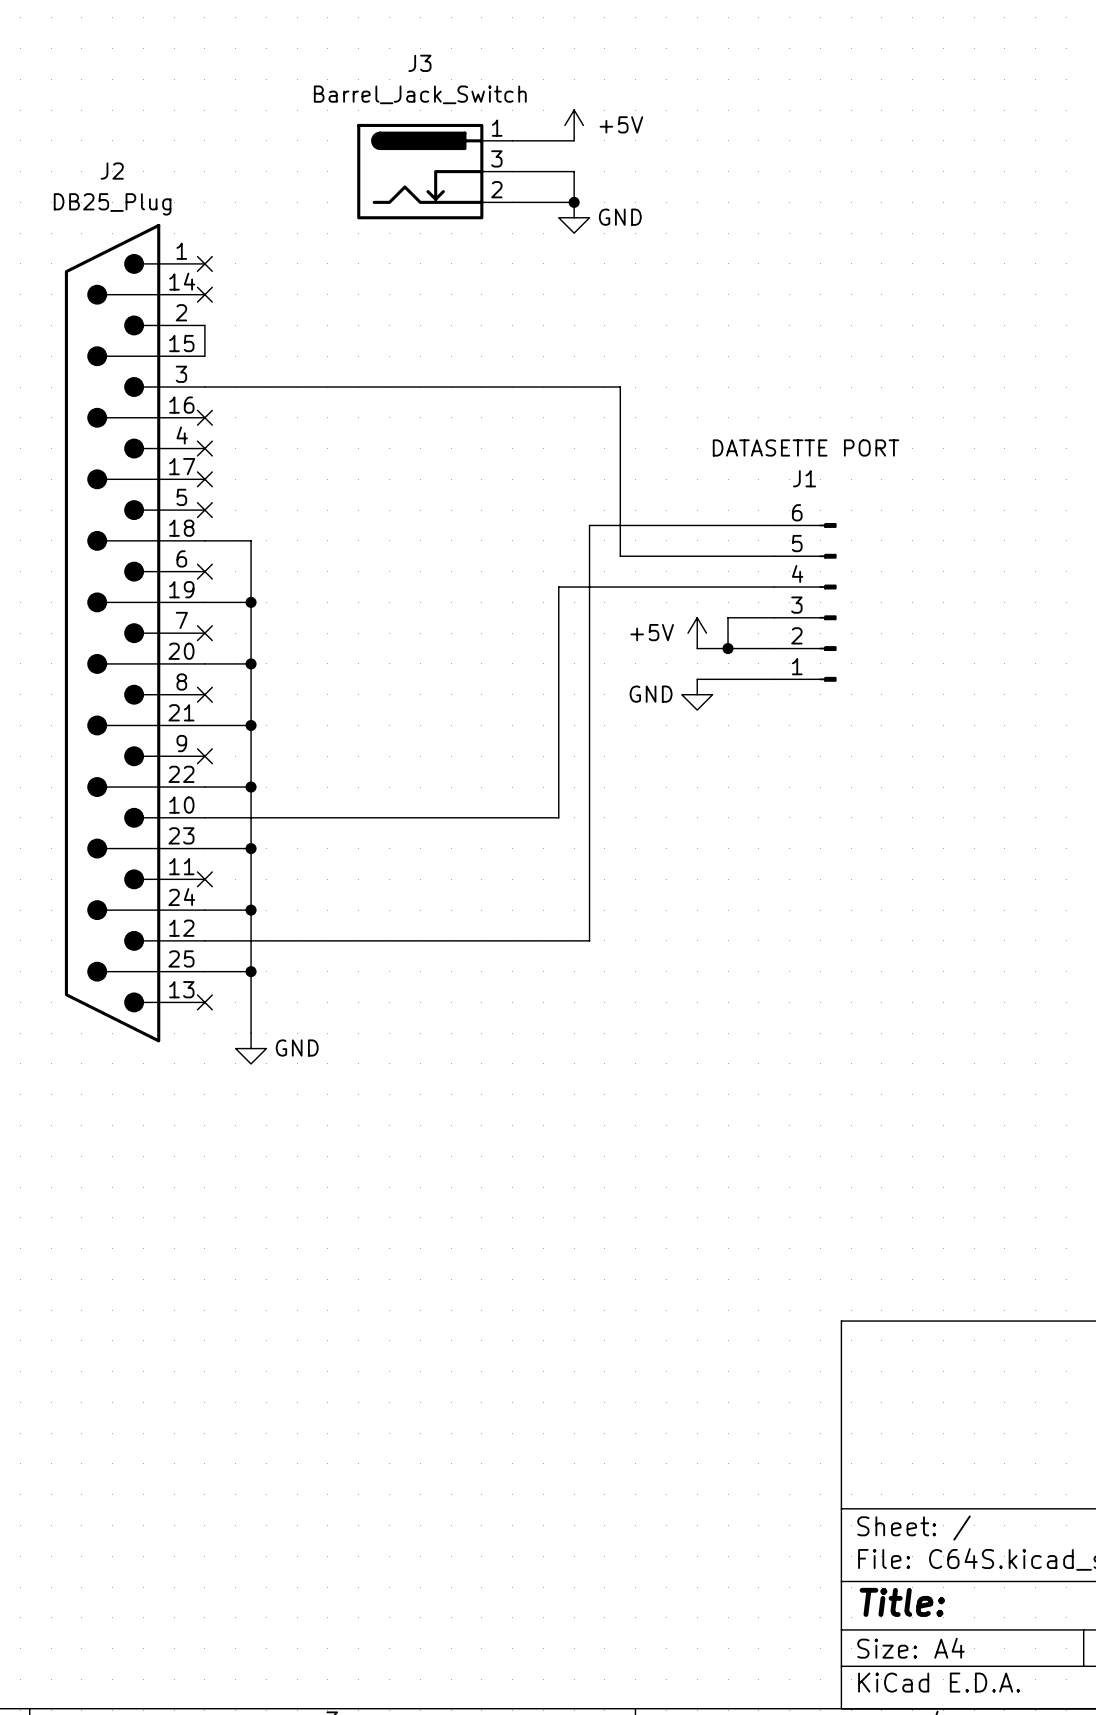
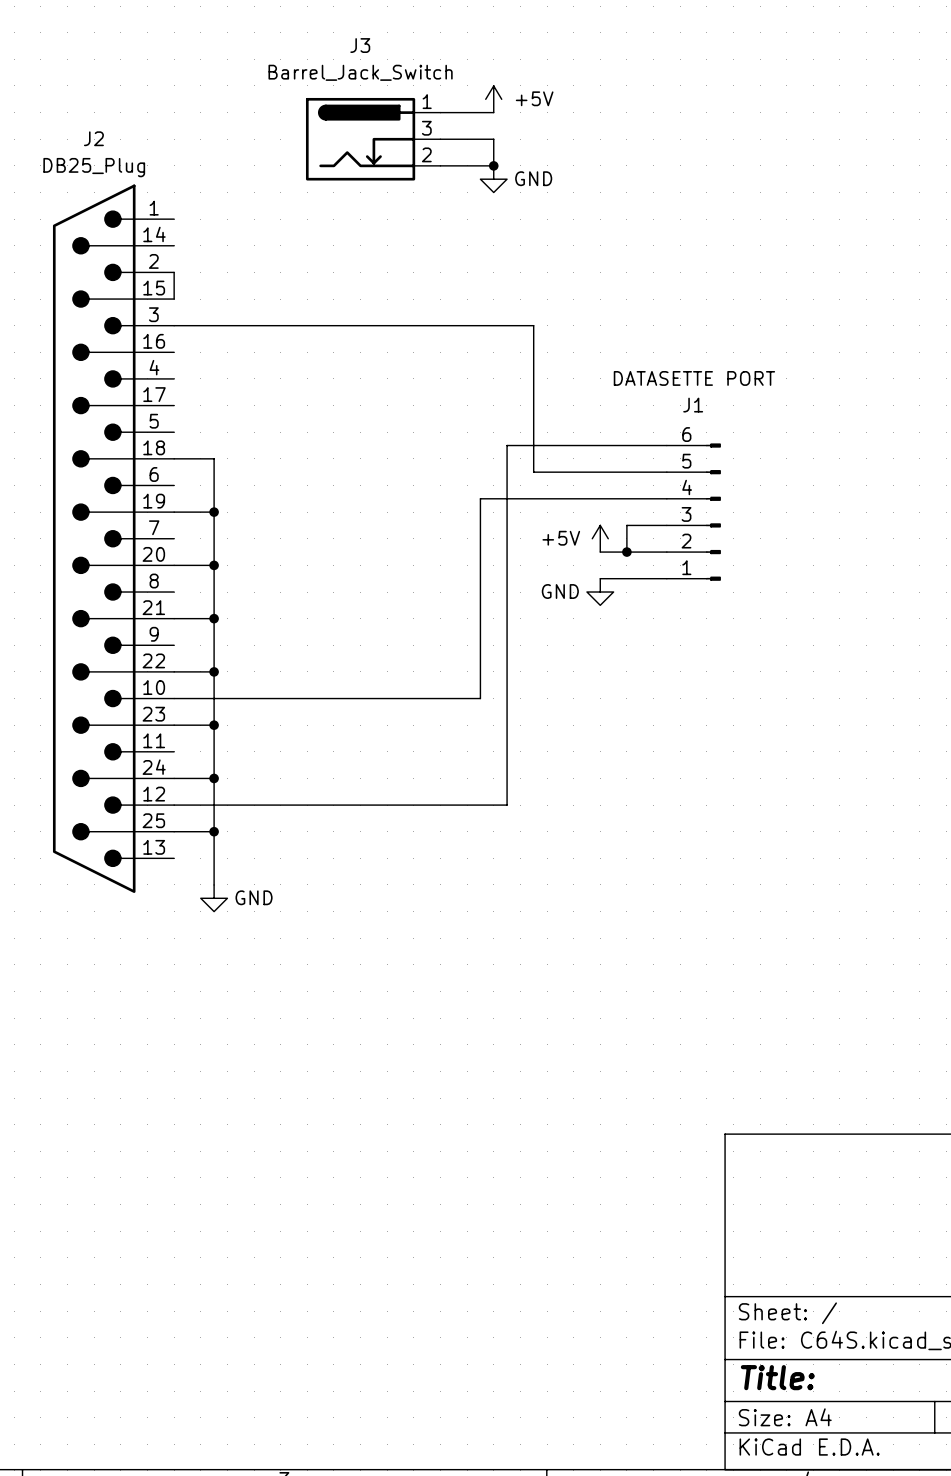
no-connect mark: (204, 263) -> none
no-connect mark: (204, 294) -> none
no-connect mark: (204, 417) -> none
no-connect mark: (204, 448) -> none
no-connect mark: (204, 479) -> none
no-connect mark: (204, 510) -> none
no-connect mark: (204, 571) -> none
no-connect mark: (204, 633) -> none
no-connect mark: (204, 694) -> none
no-connect mark: (204, 756) -> none
no-connect mark: (204, 879) -> none
no-connect mark: (204, 1002) -> none

